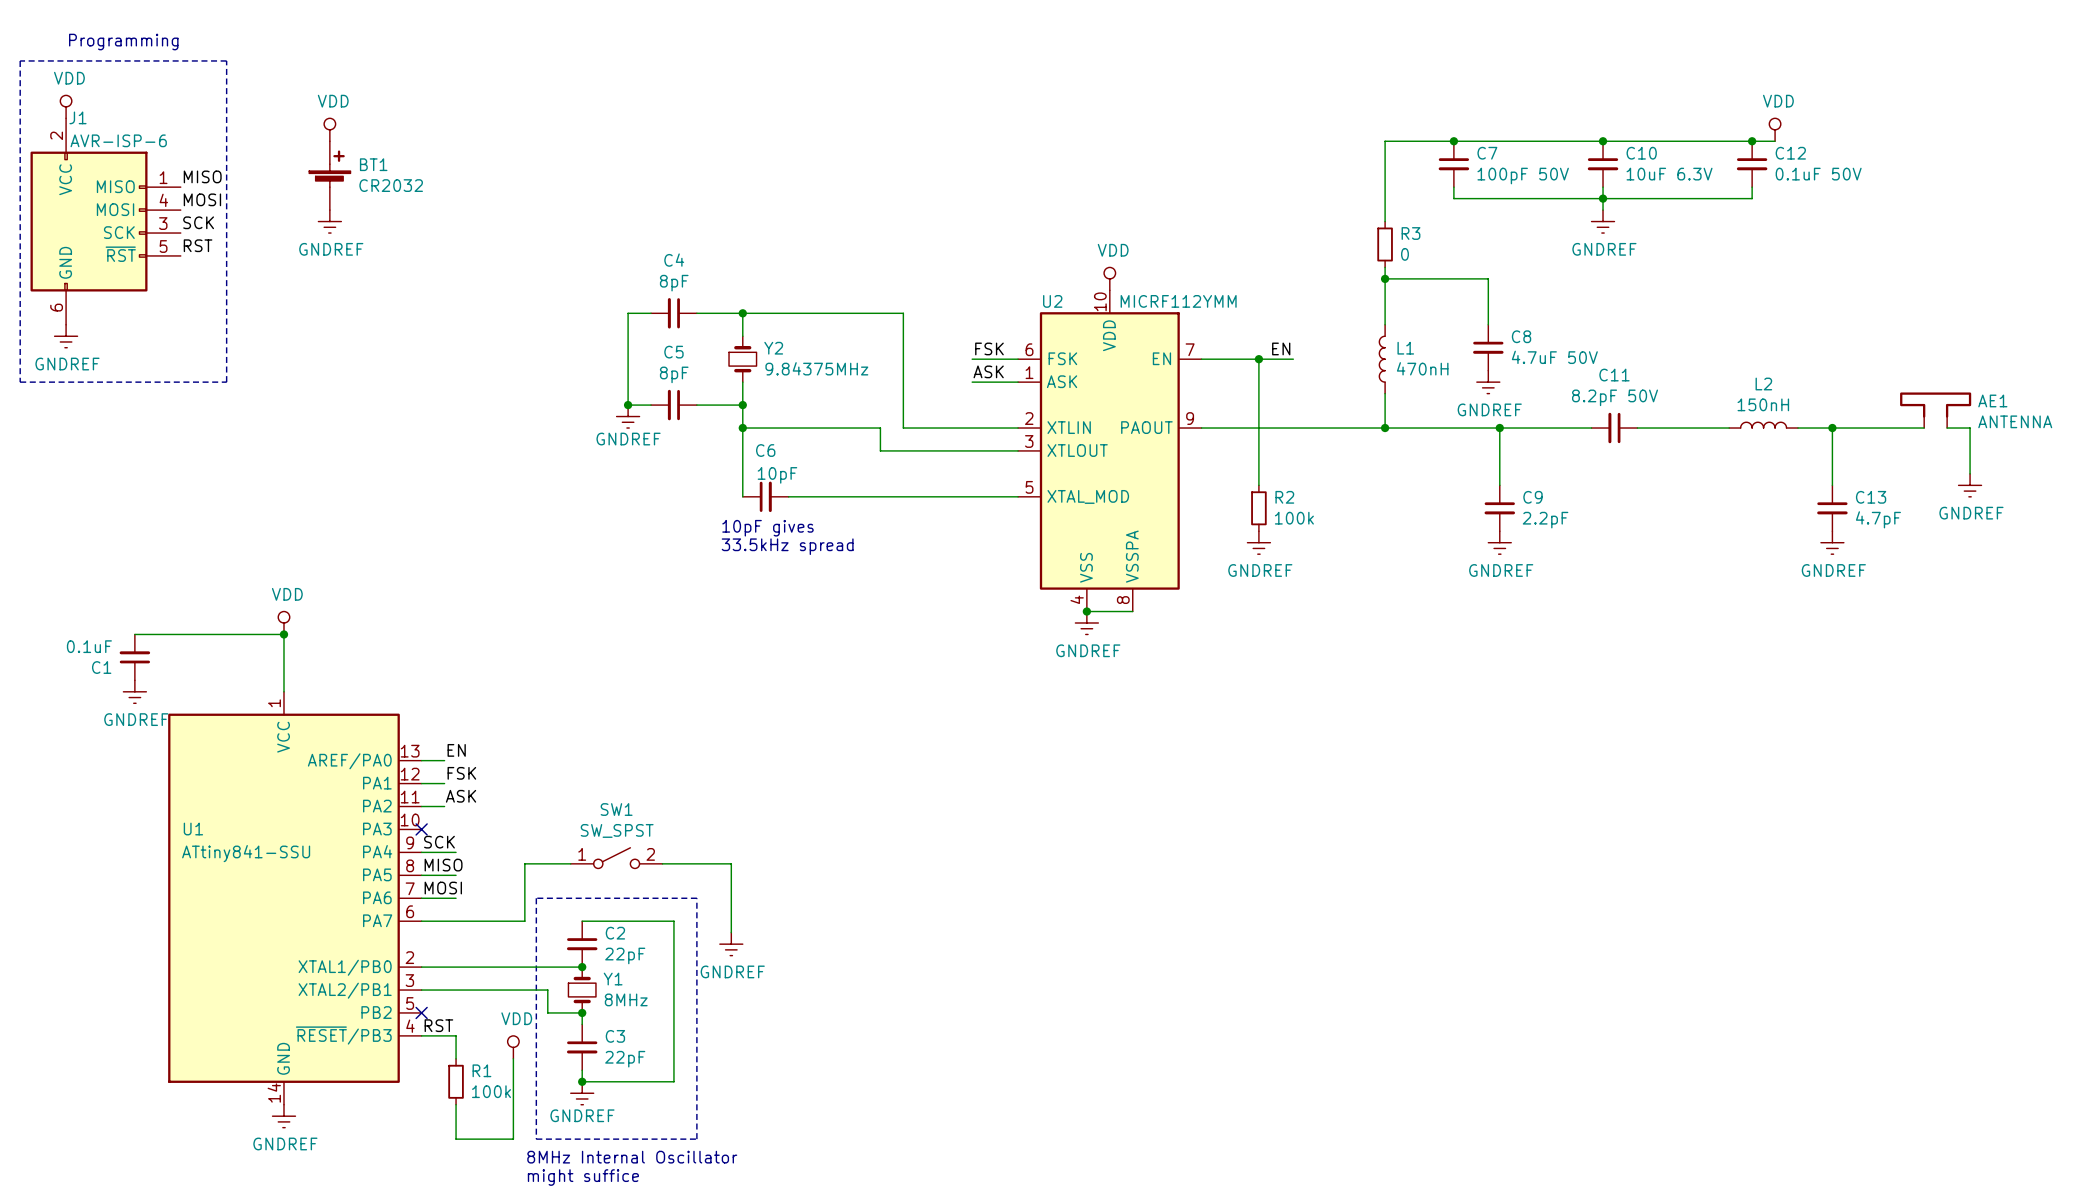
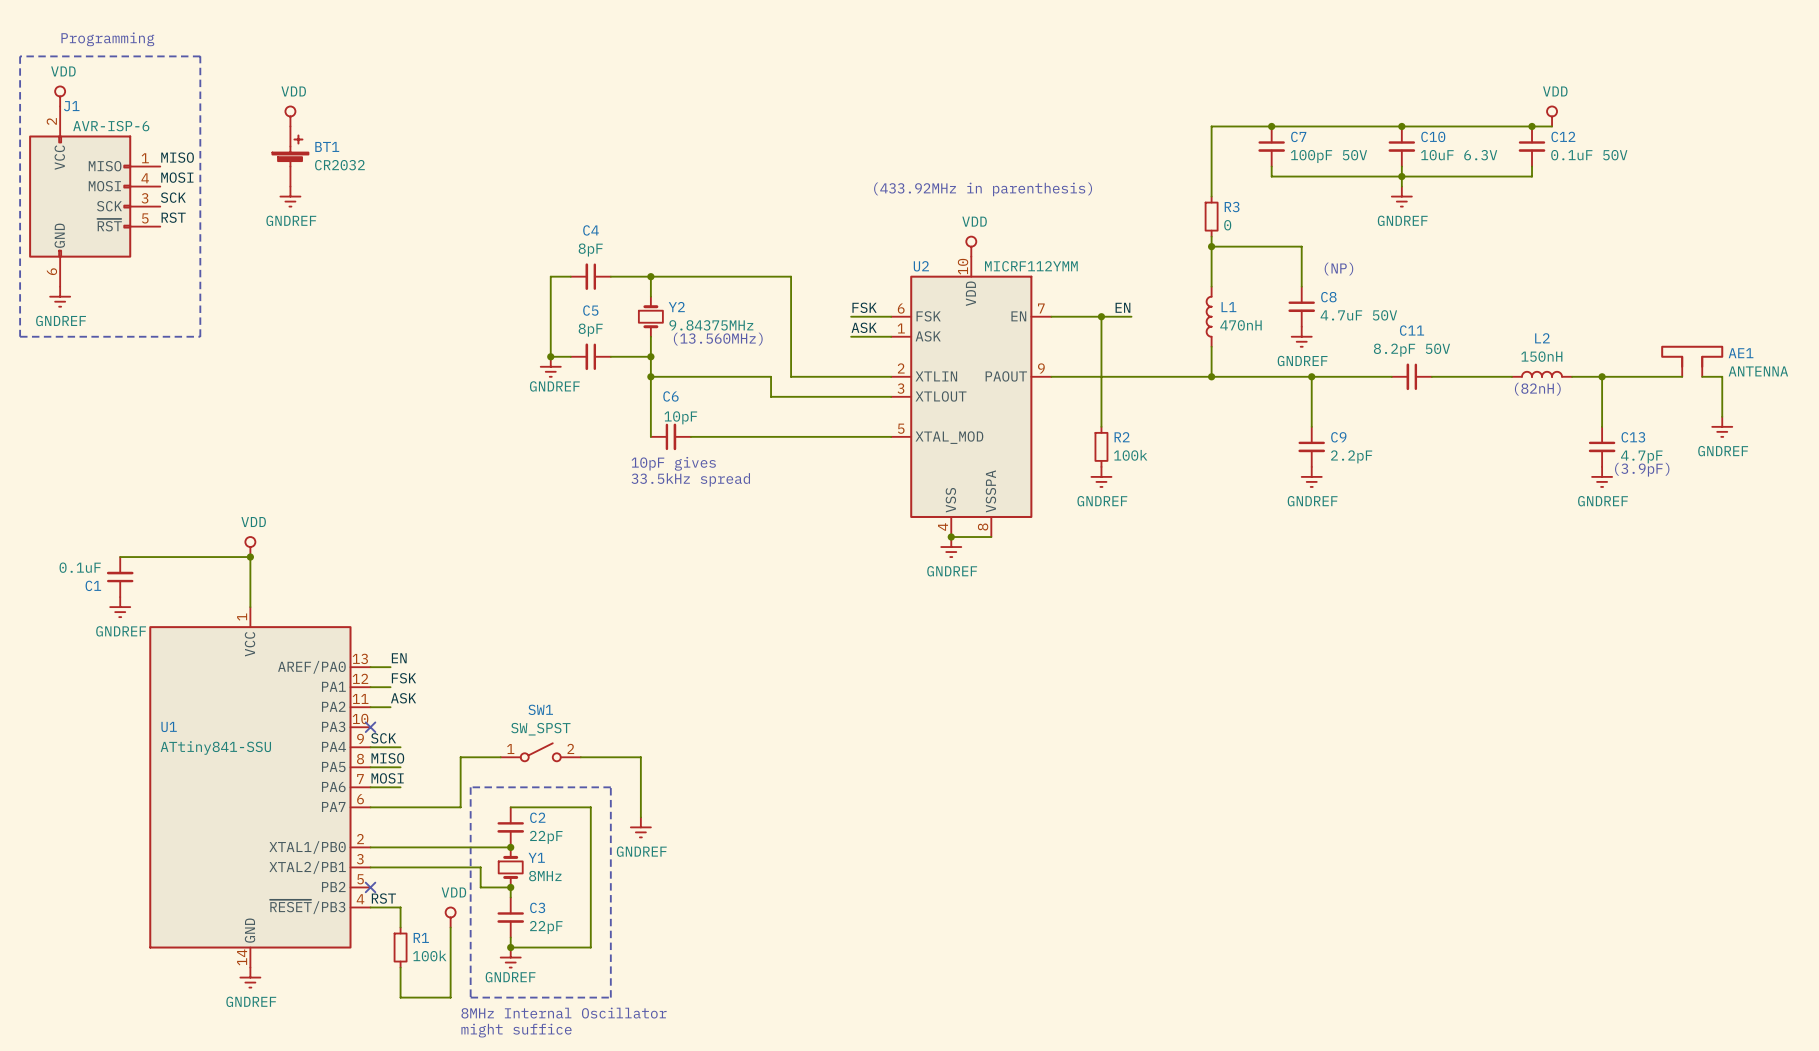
text: none -> (433.92MHz in parenthesis) (983, 189)
text: none -> (NP) (1338, 269)
text: none -> (13.560MHz) (718, 339)
text: none -> (82nH) (1537, 389)
text: none -> (3.9pF) (1642, 469)

